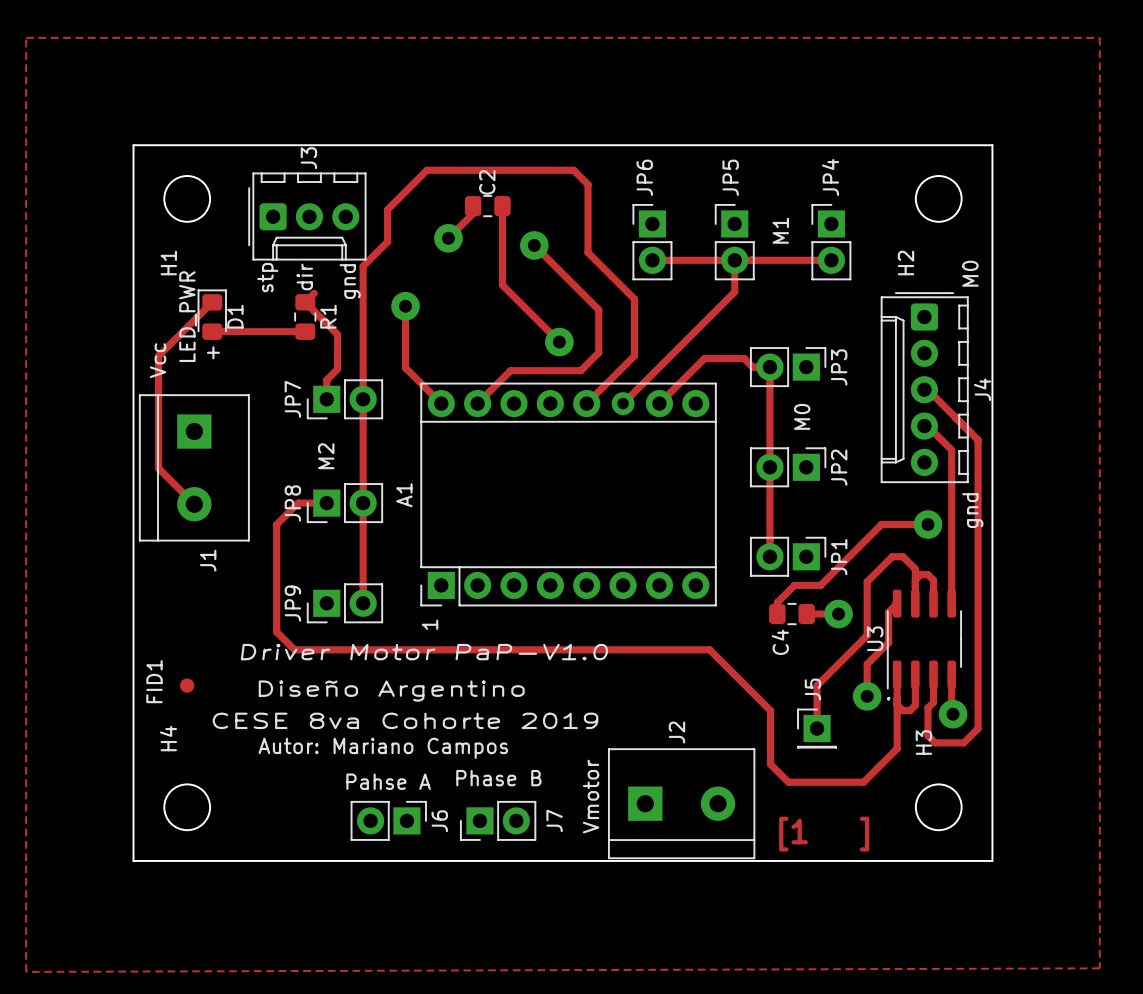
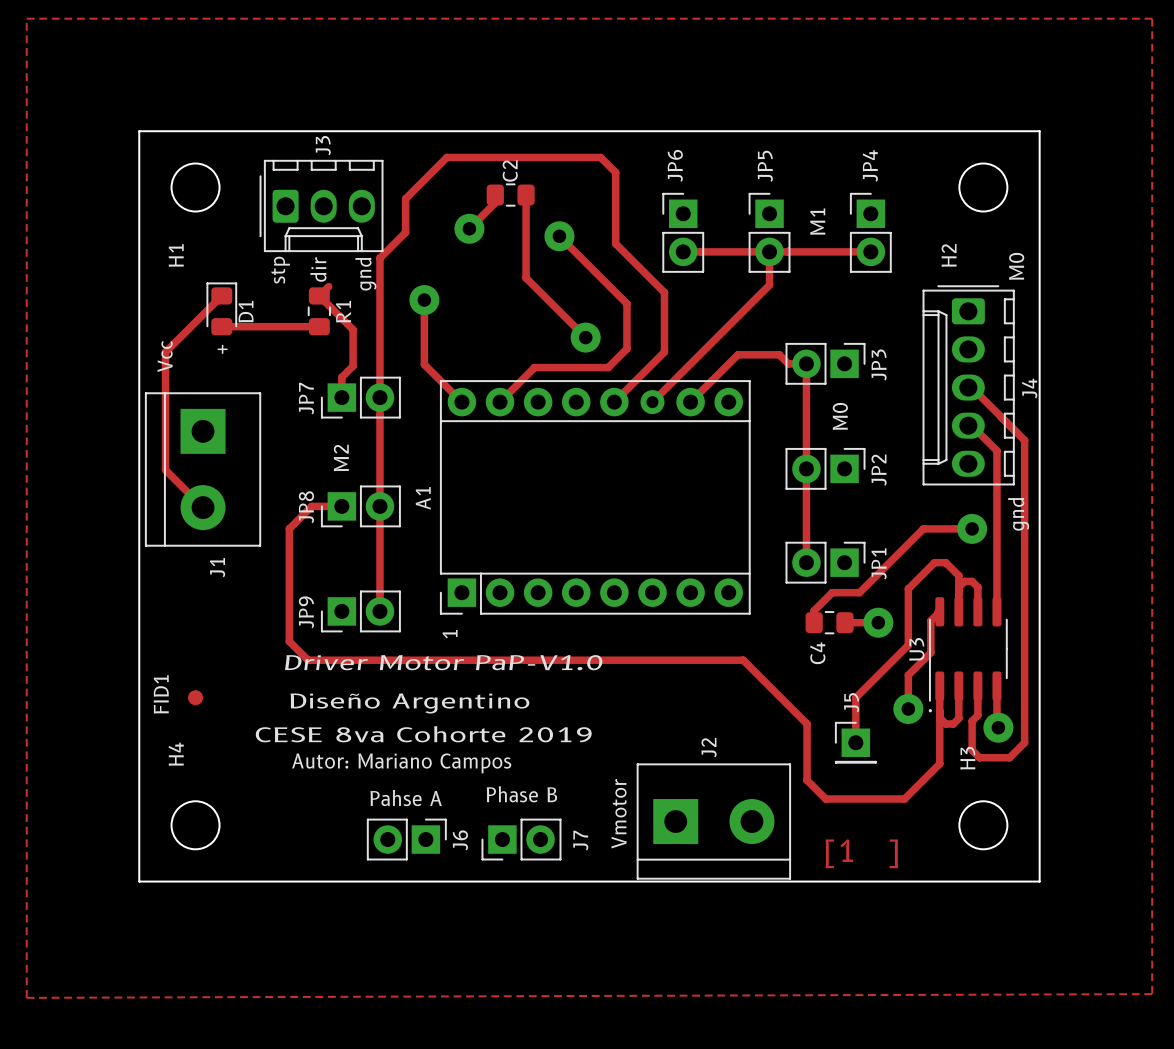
J3 footprint: [248, 172, 367, 261] -> [259, 159, 384, 253]
J4 footprint: [880, 292, 969, 484] -> [922, 285, 1015, 486]
text: LED_PWR (188, 316) -> none
J1 footprint: [138, 394, 250, 542] -> [144, 392, 262, 547]
J2 footprint: [608, 748, 756, 860] -> [636, 763, 792, 880]

